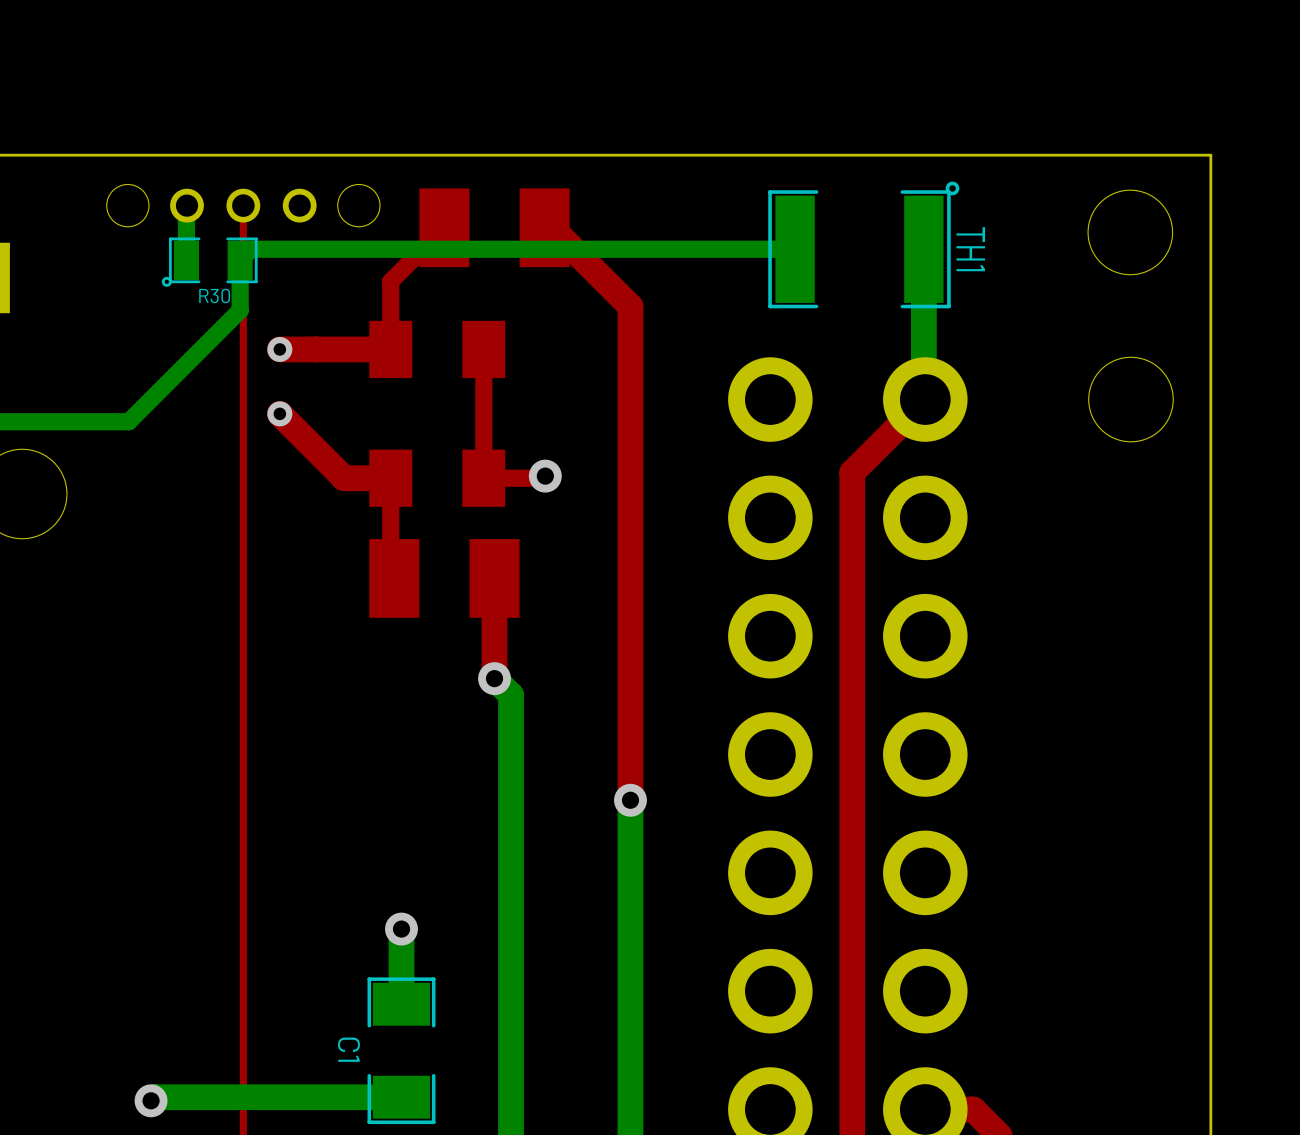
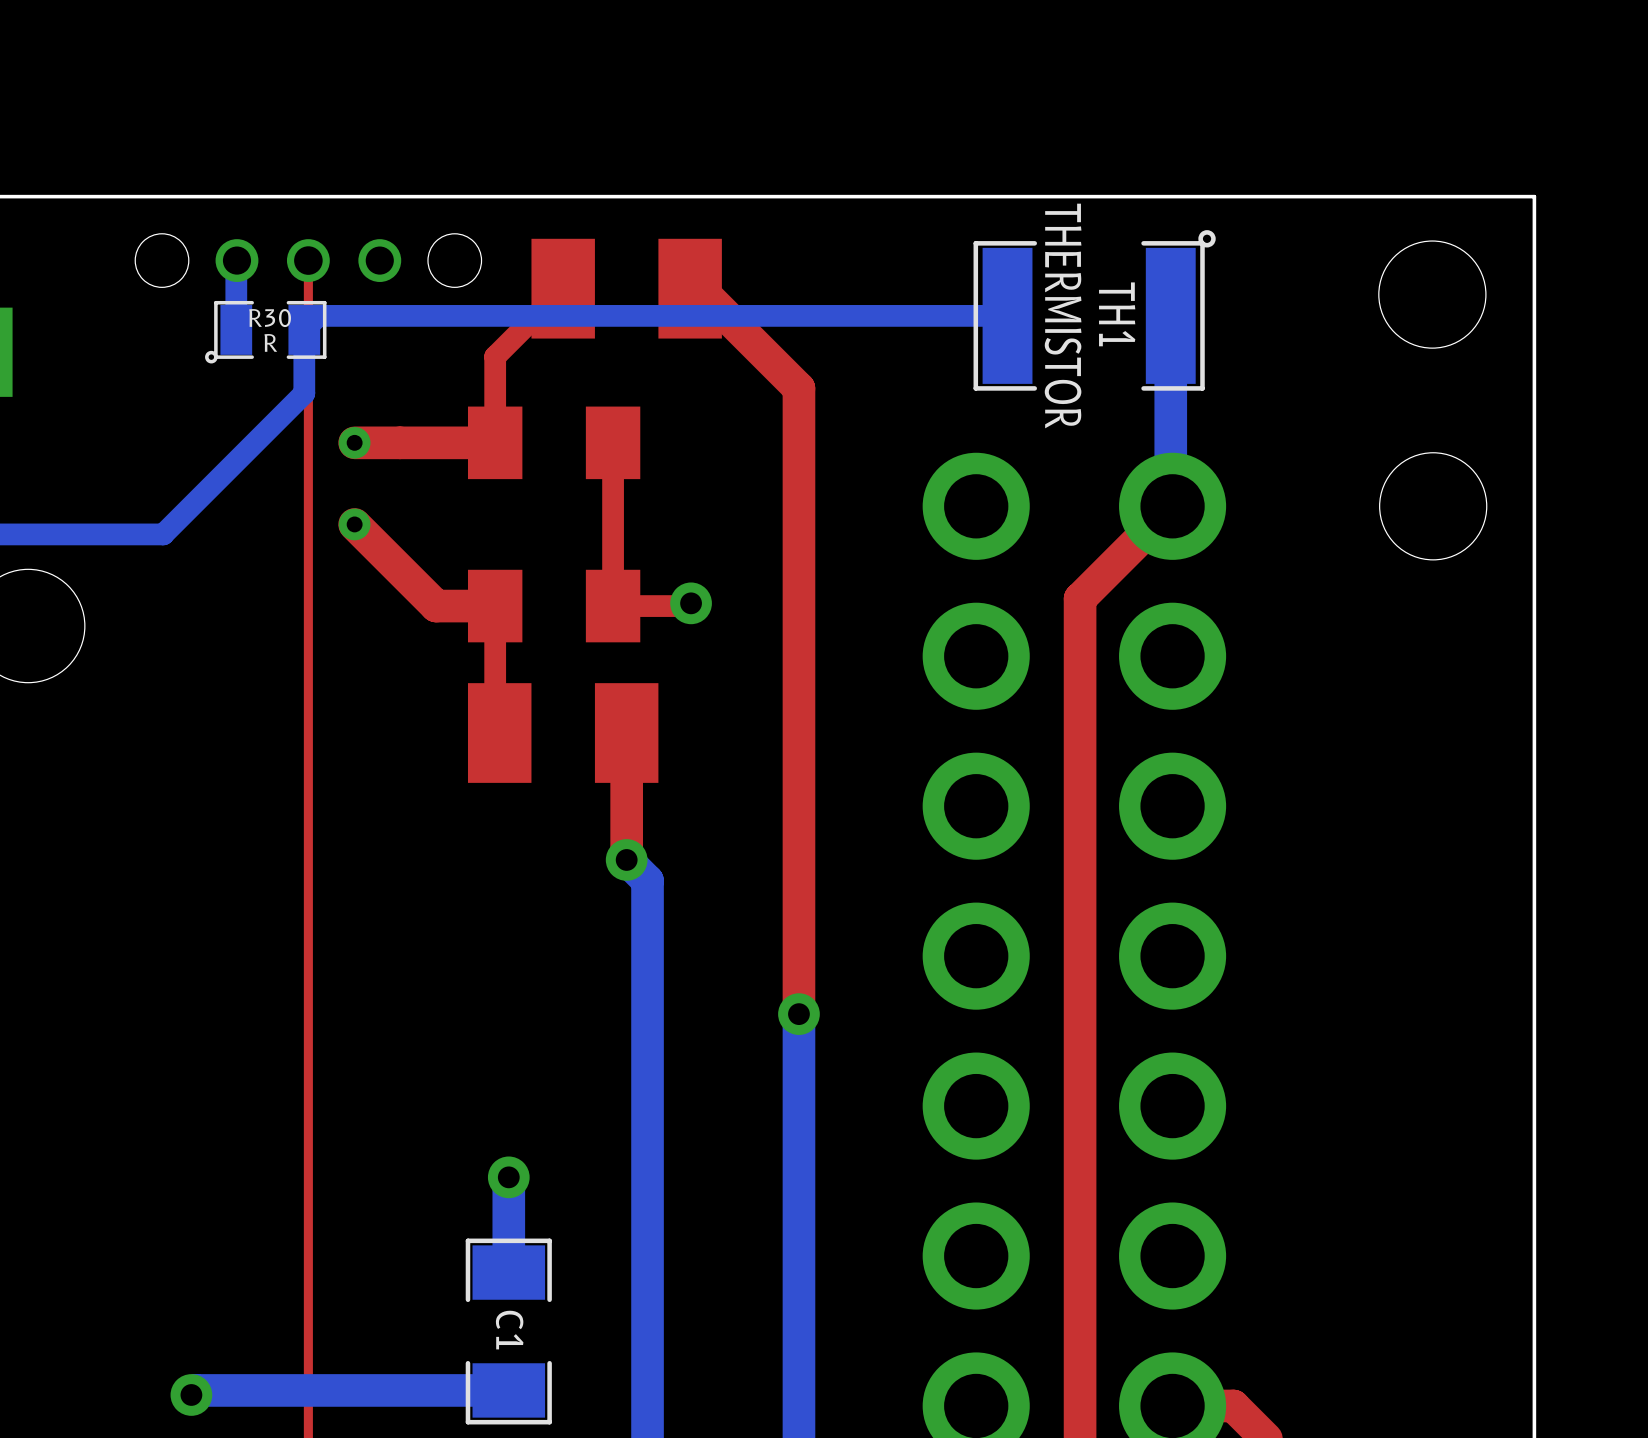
TH1 value: none -> THERMISTOR (1063, 316)
TH1 name position: TH1 (970, 249) -> TH1 (1117, 314)
R30 value: none -> R (270, 342)
R30 name position: R30 (214, 295) -> R30 (270, 318)
C1 name position: C1 (348, 1049) -> C1 (509, 1330)

